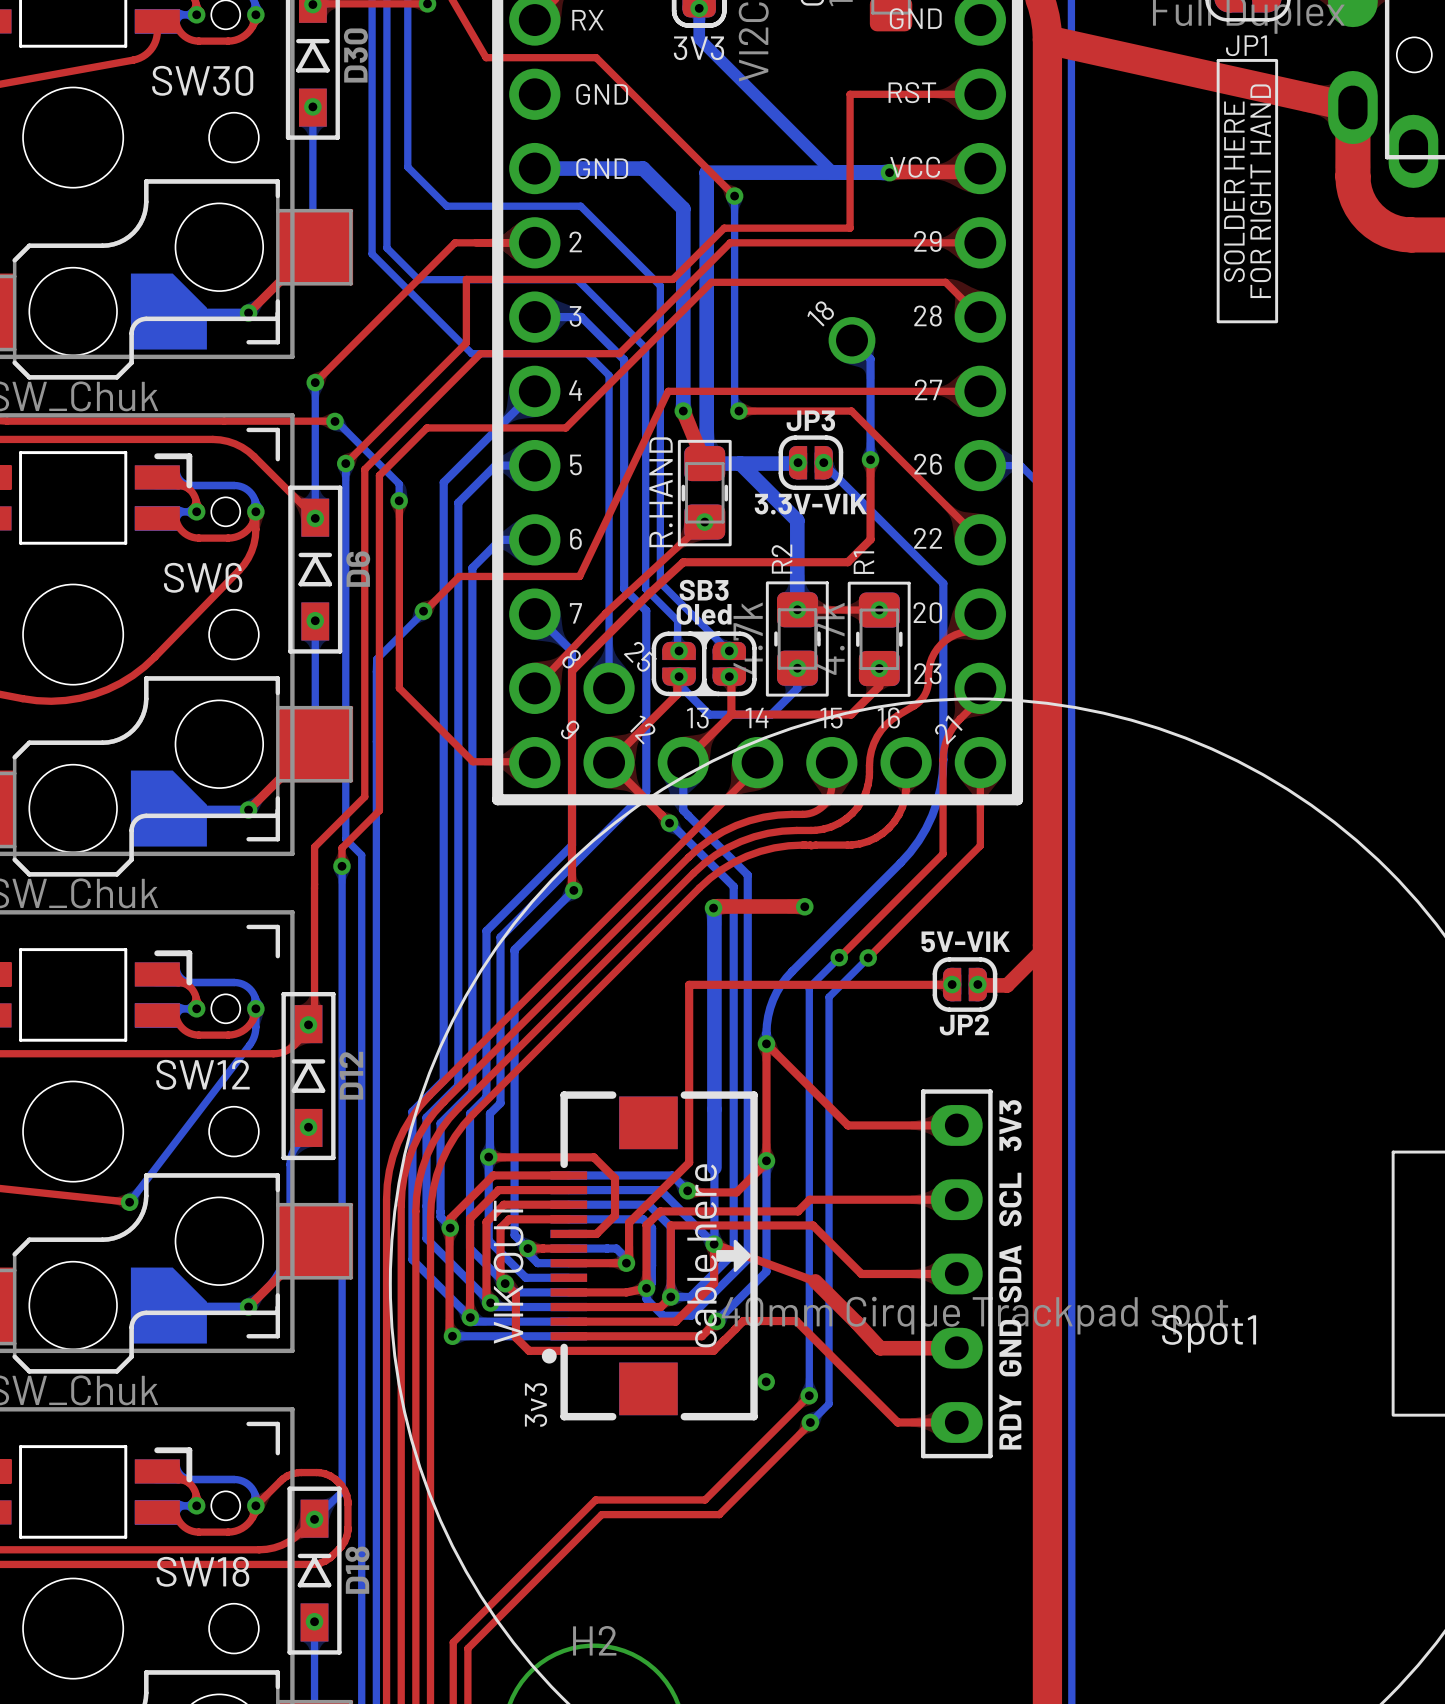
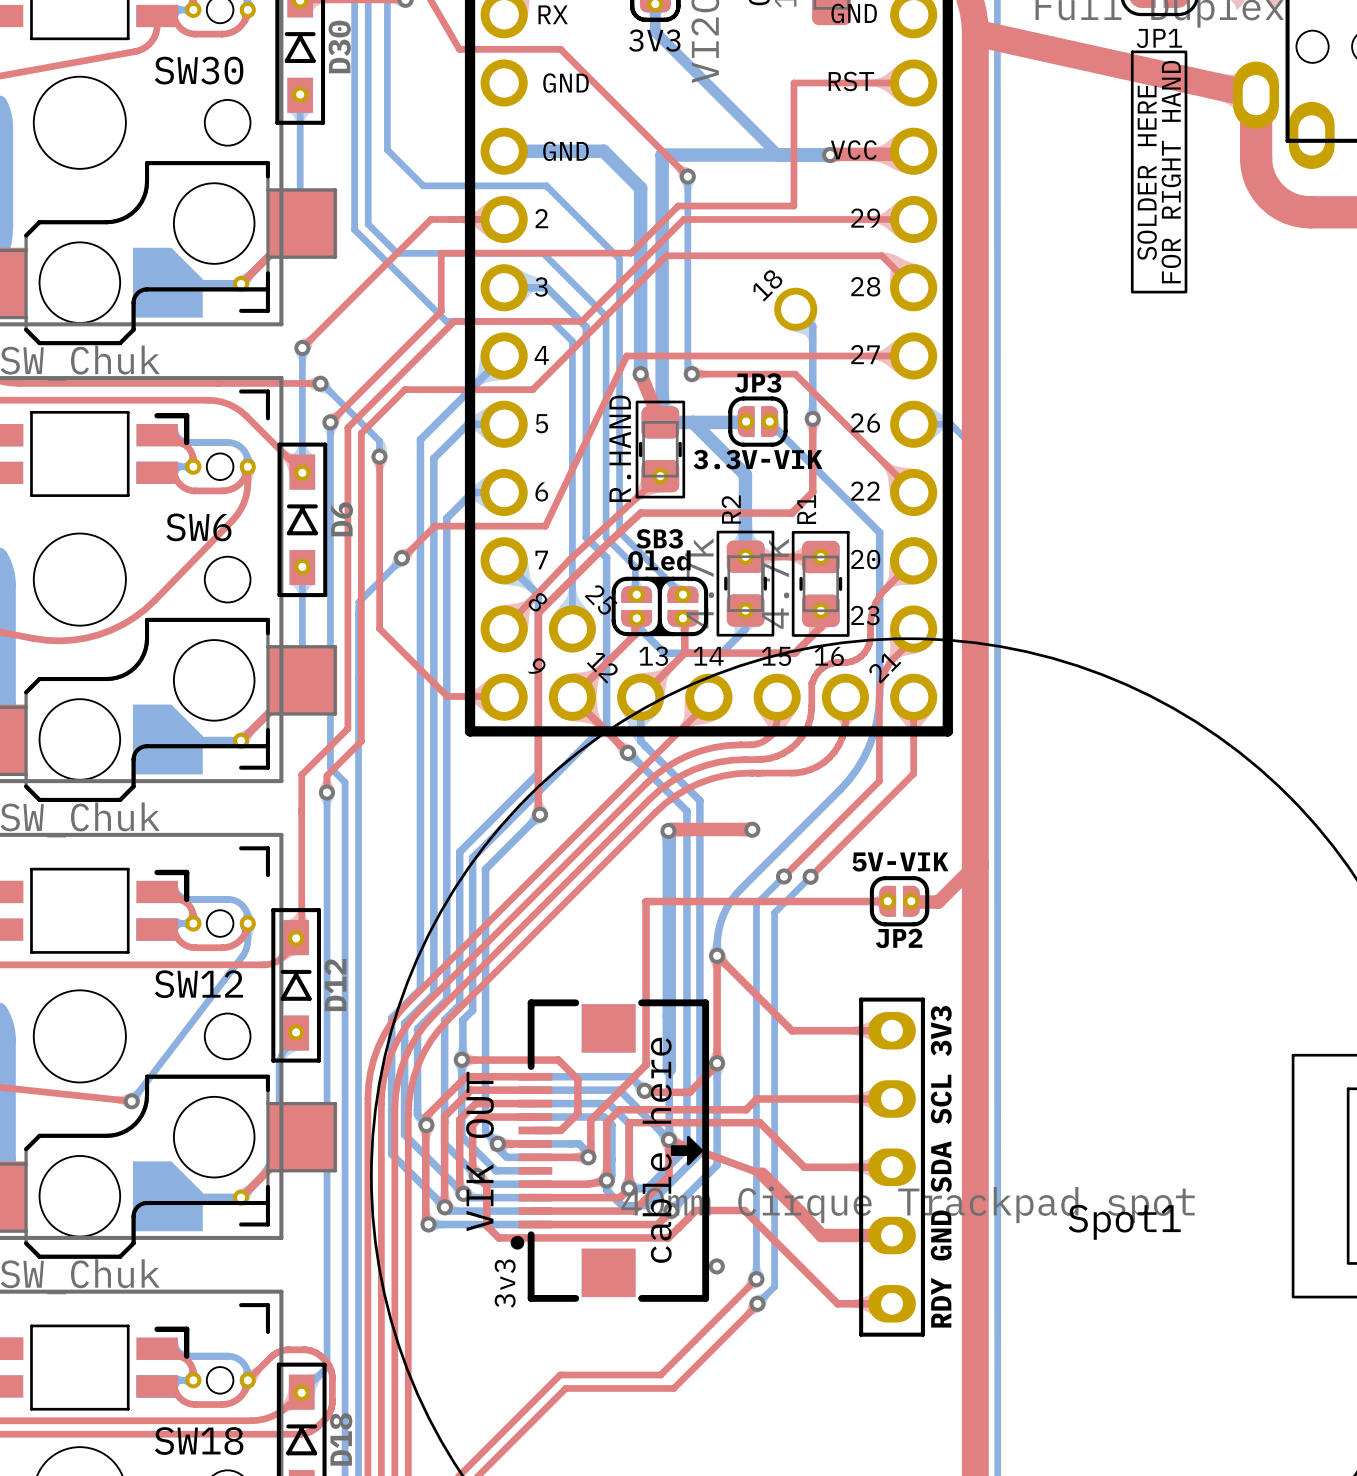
top track: (980, 614) (972, 631) (950, 637) (937, 648) (929, 663) (928, 684) (924, 695) (917, 703) (892, 719) (881, 730) (873, 743) (869, 765) -> (913, 560) (883, 590) (876, 602) (871, 615) (869, 643) (864, 652) (851, 661) (830, 663) (821, 668) (811, 683) (811, 699)

